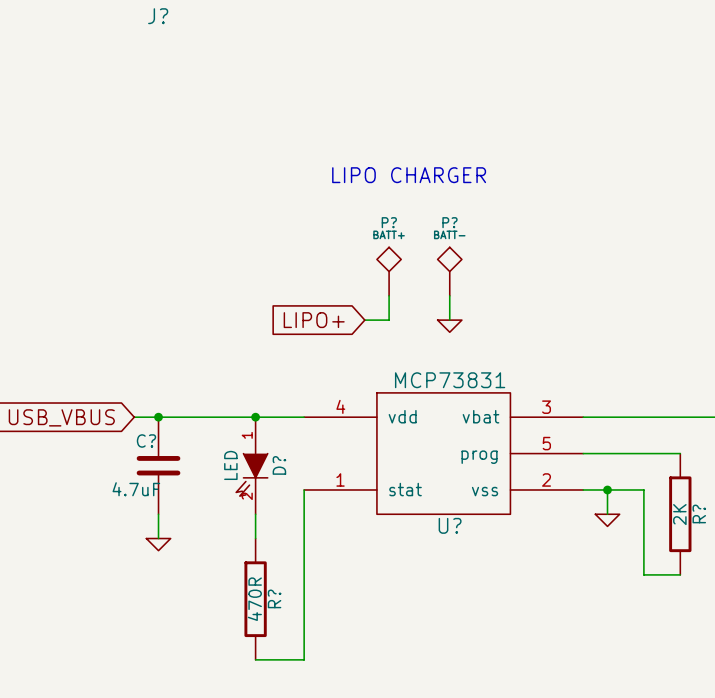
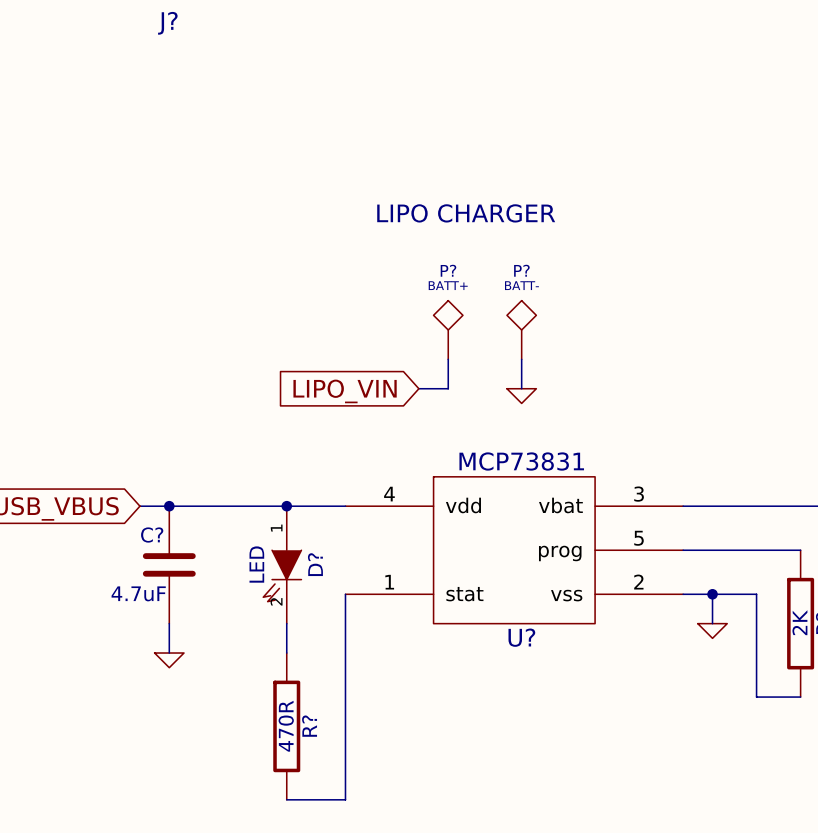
global label: LIPO+ (314, 320) -> LIPO_VIN (345, 391)

